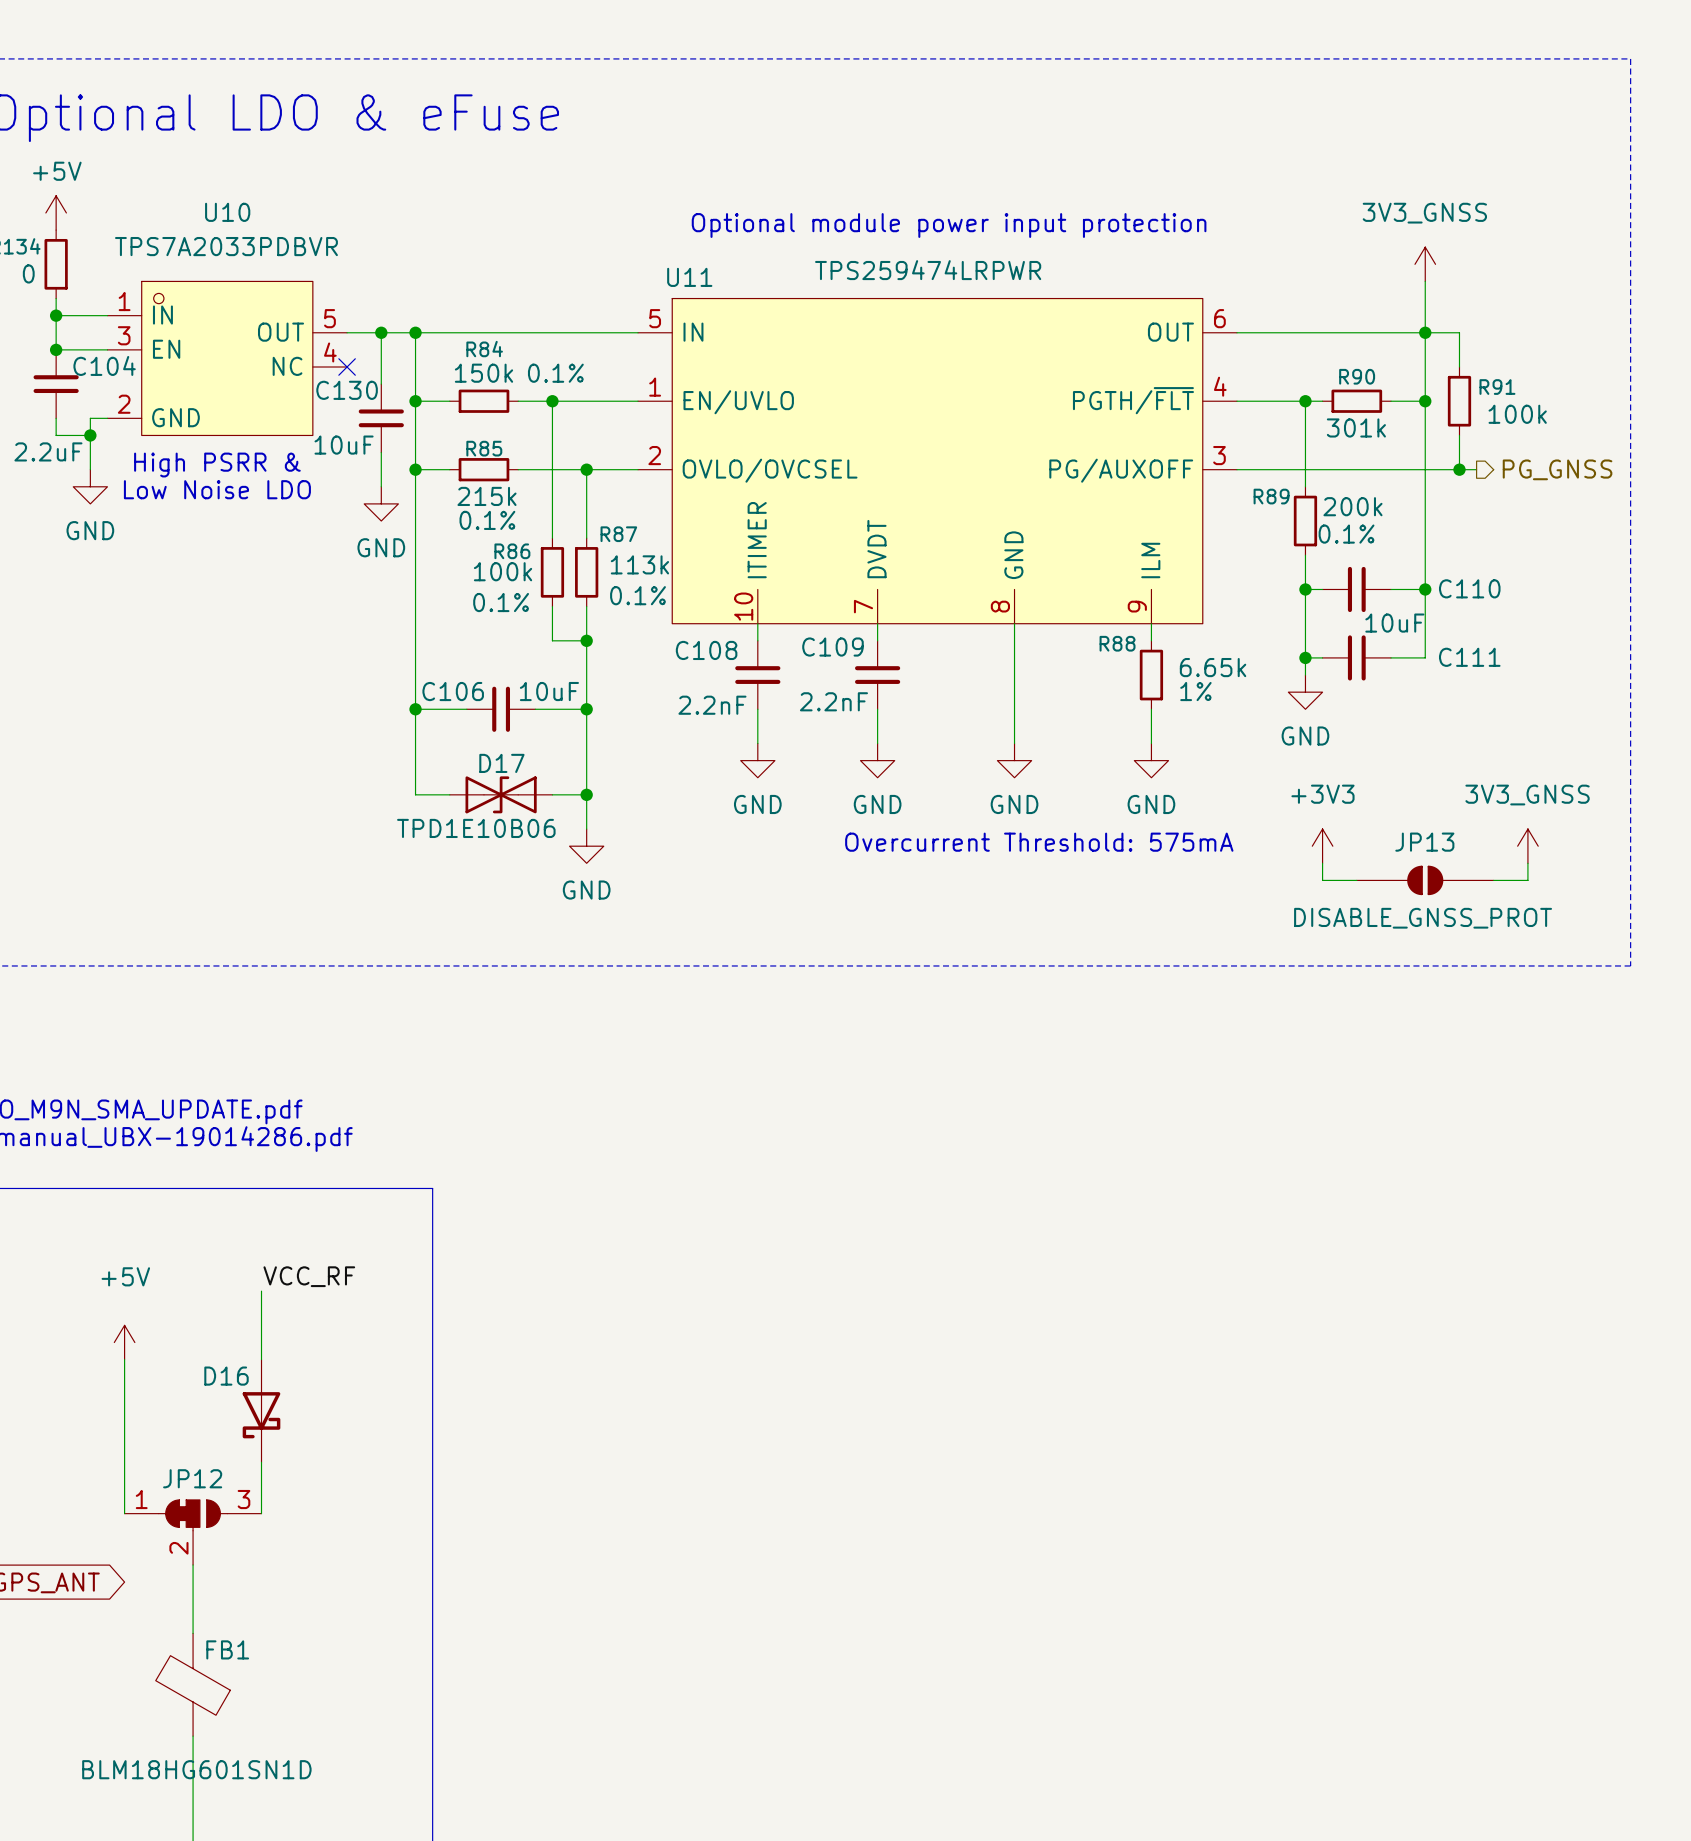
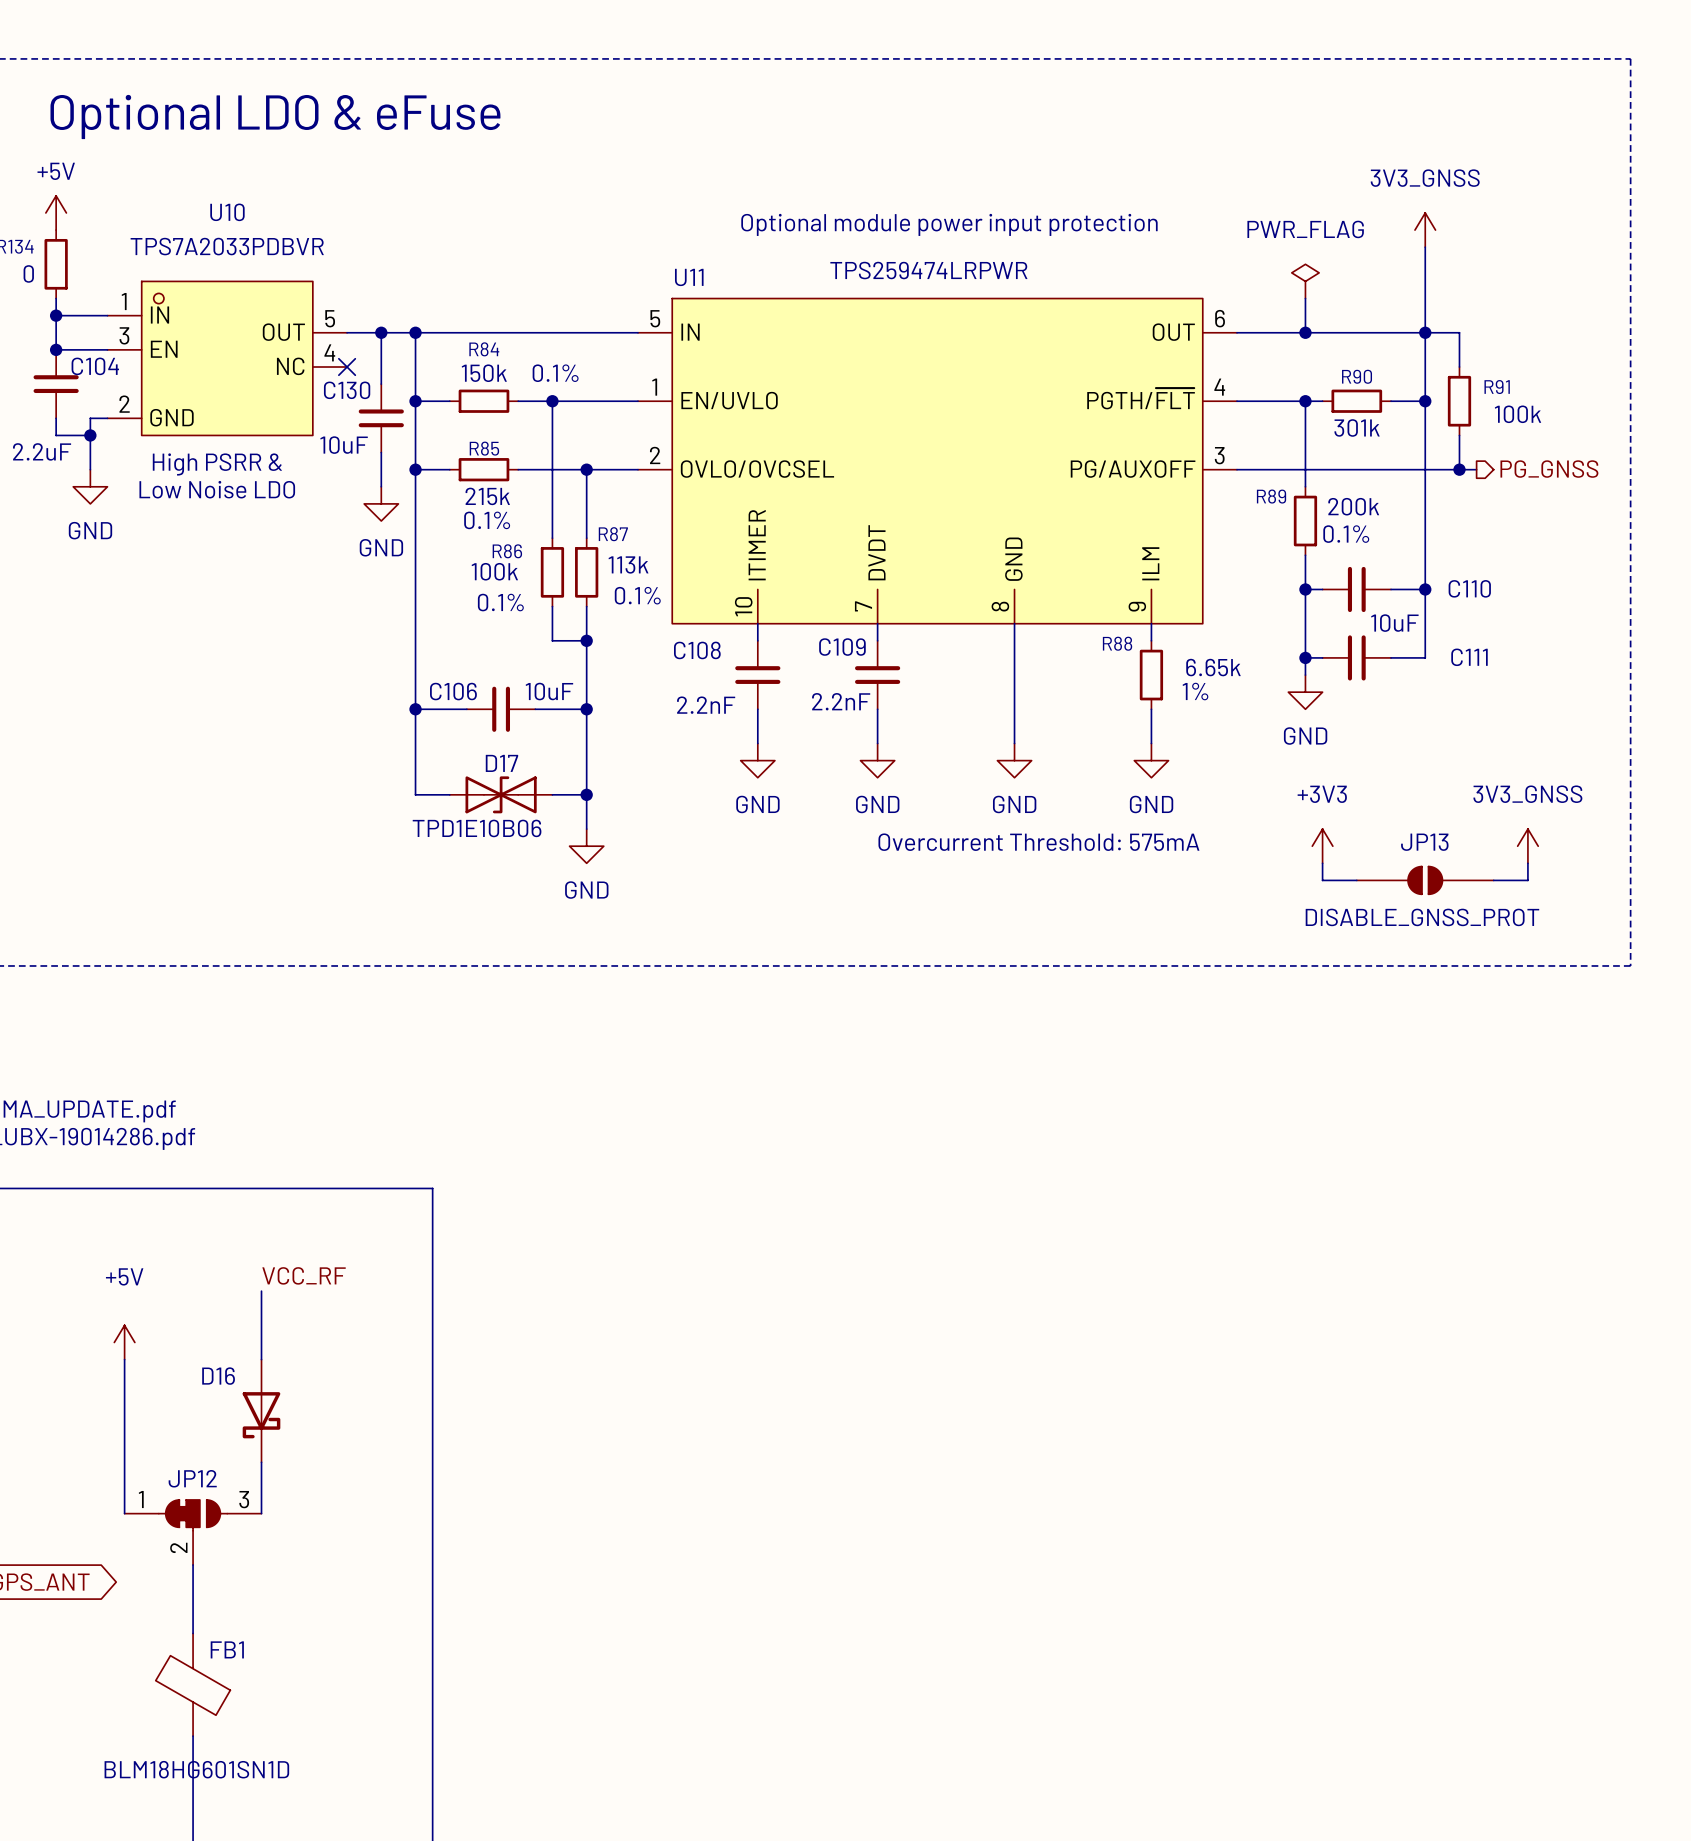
power symbol position: 3V3_GNSS (1425, 264) -> 3V3_GNSS (1425, 230)
power symbol: none -> PWR_FLAG (1305, 281)
wire: none -> (1305, 298) (1305, 332)
junction: none -> (1305, 332)

